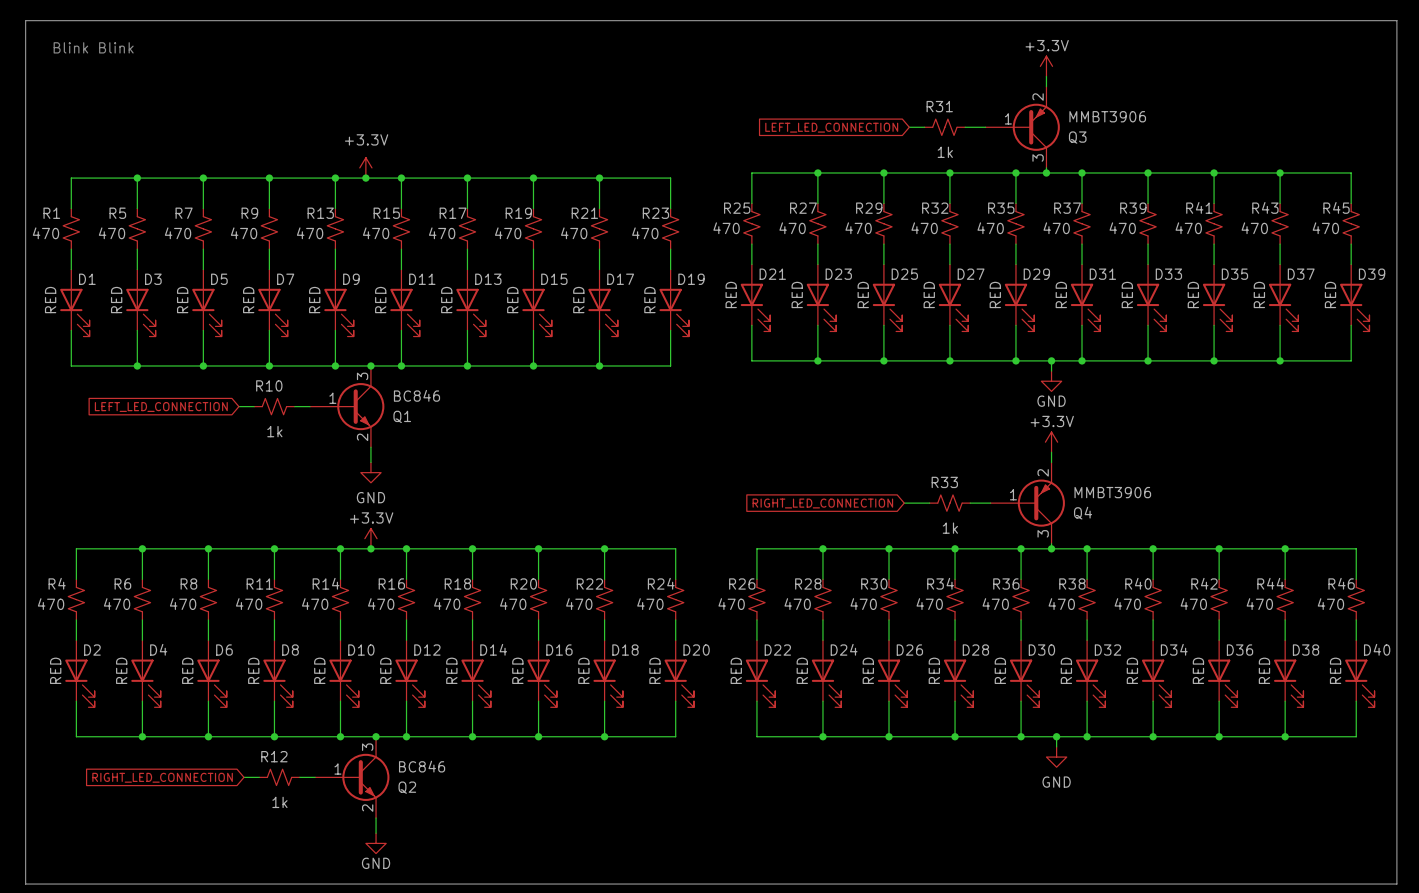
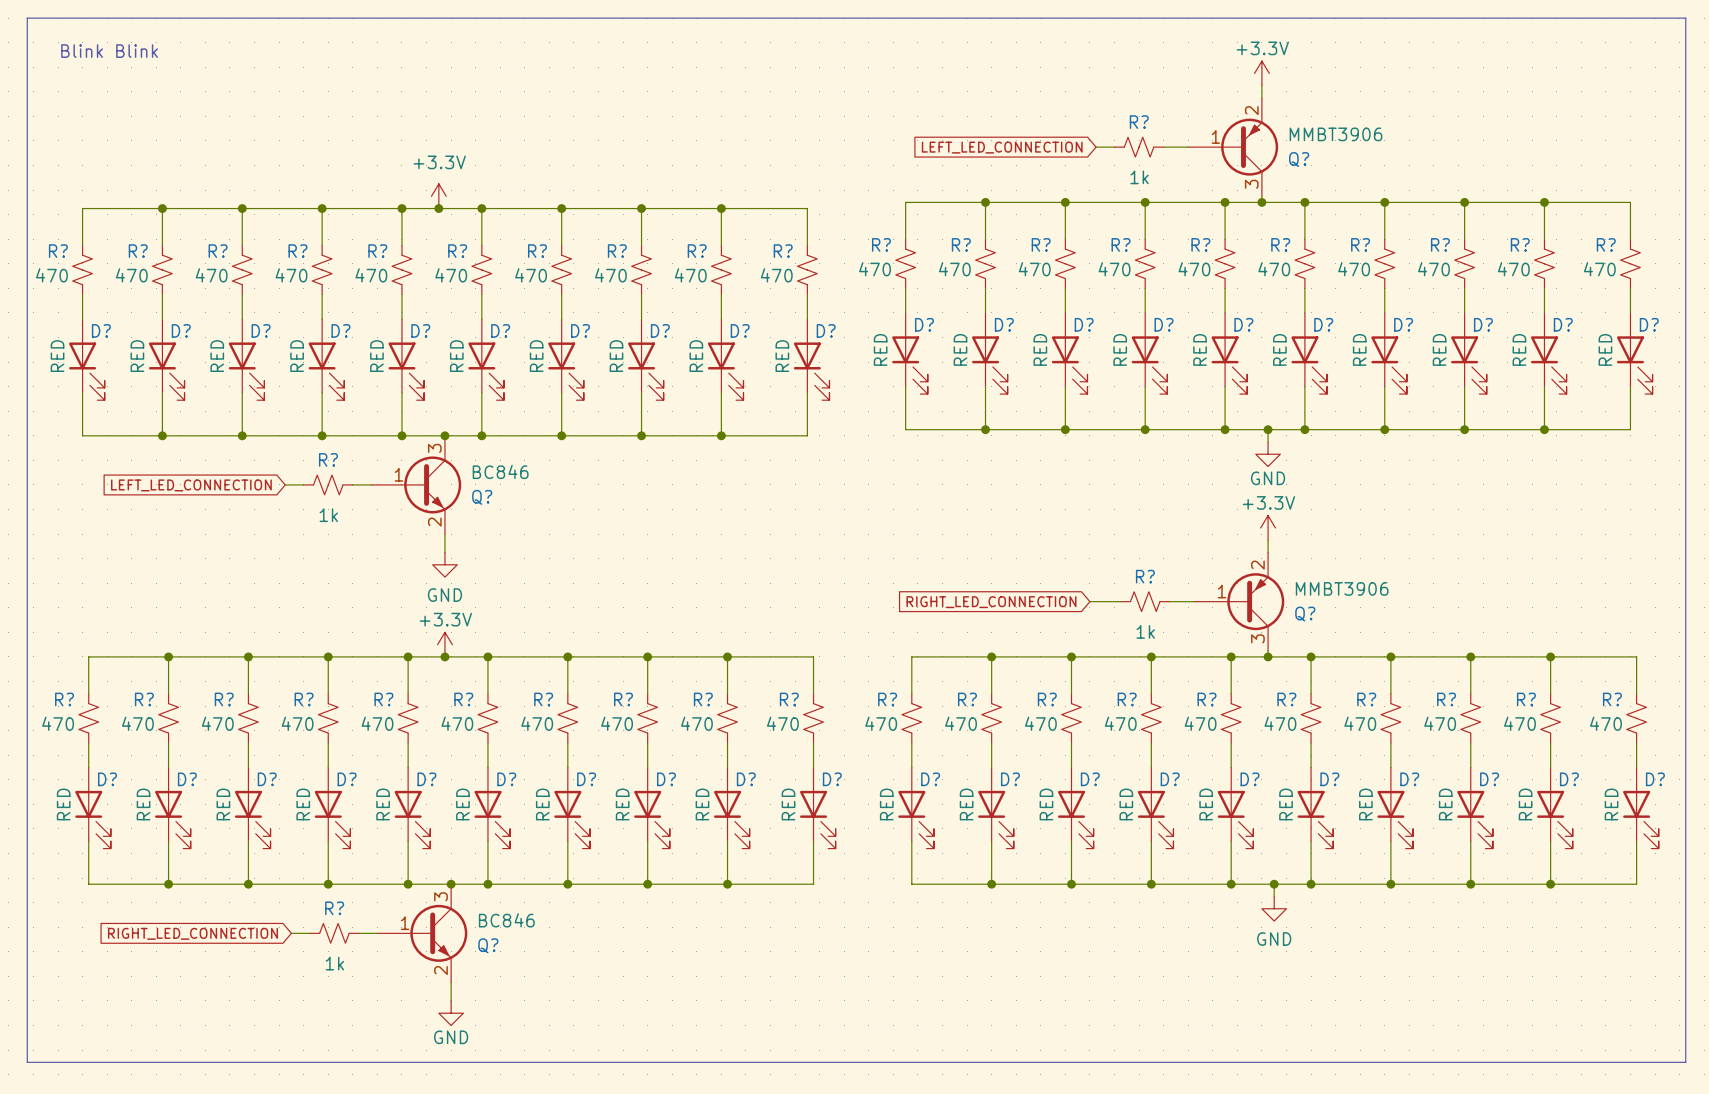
R31 name: R31 (939, 106) -> R? (1139, 122)
Q3 name: Q3 (1077, 137) -> Q? (1299, 159)
R41 name: R41 (1199, 207) -> R? (1440, 244)
R43 name: R43 (1265, 207) -> R? (1520, 244)
R45 name: R45 (1336, 207) -> R? (1606, 244)
R25 name: R25 (737, 208) -> R? (881, 244)
R27 name: R27 (803, 208) -> R? (961, 244)
R29 name: R29 (869, 208) -> R? (1041, 244)
R32 name: R32 (935, 208) -> R? (1121, 244)
R35 name: R35 (1001, 208) -> R? (1200, 244)
R37 name: R37 (1067, 208) -> R? (1280, 244)
R39 name: R39 (1133, 208) -> R? (1360, 244)
R1 name: R1 (51, 213) -> R? (58, 251)
R5 name: R5 (117, 213) -> R? (138, 251)
R7 name: R7 (184, 213) -> R? (218, 251)
R9 name: R9 (249, 213) -> R? (297, 251)
R13 name: R13 (320, 213) -> R? (377, 251)
R15 name: R15 (386, 213) -> R? (457, 251)
R17 name: R17 (453, 213) -> R? (537, 251)
R19 name: R19 (518, 213) -> R? (617, 251)
R21 name: R21 (584, 213) -> R? (697, 251)
R23 name: R23 (655, 213) -> R? (783, 251)
D21 name: D21 (772, 274) -> D? (924, 324)
D23 name: D23 (838, 274) -> D? (1004, 324)
D25 name: D25 (904, 274) -> D? (1084, 324)
D27 name: D27 (971, 274) -> D? (1164, 324)
D29 name: D29 (1036, 274) -> D? (1243, 324)
D31 name: D31 (1102, 274) -> D? (1323, 324)
D33 name: D33 (1168, 274) -> D? (1403, 324)
D35 name: D35 (1234, 274) -> D? (1483, 324)
D37 name: D37 (1301, 274) -> D? (1563, 324)
D39 name: D39 (1372, 274) -> D? (1649, 324)
D1 name: D1 (87, 279) -> D? (101, 330)
D3 name: D3 (153, 279) -> D? (181, 330)
D5 name: D5 (219, 279) -> D? (261, 330)
D7 name: D7 (285, 279) -> D? (340, 330)
D9 name: D9 (351, 279) -> D? (420, 330)
D11 name: D11 (422, 279) -> D? (500, 330)
D13 name: D13 (488, 279) -> D? (580, 330)
D15 name: D15 (554, 279) -> D? (660, 330)
D17 name: D17 (620, 279) -> D? (740, 330)
D19 name: D19 (691, 279) -> D? (826, 330)
R10 name: R10 (269, 385) -> R? (328, 459)
Q1 name: Q1 (402, 416) -> Q? (482, 497)
R33 name: R33 (944, 482) -> R? (1145, 576)
Q4 name: Q4 (1083, 513) -> Q? (1305, 614)
R4 name: R4 (57, 583) -> R? (64, 699)
R14 name: R14 (326, 583) -> R? (383, 699)
R24 name: R24 (661, 583) -> R? (789, 699)
R34 name: R34 (940, 583) -> R? (1127, 699)
R40 name: R40 (1138, 583) -> R? (1366, 699)
R42 name: R42 (1204, 583) -> R? (1446, 699)
R44 name: R44 (1270, 583) -> R? (1526, 699)
R46 name: R46 (1341, 583) -> R? (1612, 699)
R6 name: R6 (122, 584) -> R? (144, 699)
R8 name: R8 (188, 584) -> R? (224, 699)
R11 name: R11 (259, 584) -> R? (304, 699)
R16 name: R16 (391, 584) -> R? (463, 699)
R18 name: R18 (457, 584) -> R? (543, 699)
R20 name: R20 (523, 584) -> R? (623, 699)
R22 name: R22 (589, 584) -> R? (703, 699)
R26 name: R26 (742, 584) -> R? (887, 699)
R28 name: R28 (808, 584) -> R? (967, 699)
R30 name: R30 (874, 584) -> R? (1047, 699)
R36 name: R36 (1006, 584) -> R? (1207, 699)
R38 name: R38 (1072, 584) -> R? (1286, 699)
D4 name: D4 (158, 649) -> D? (187, 779)
D14 name: D14 (493, 649) -> D? (586, 779)
D24 name: D24 (844, 649) -> D? (1010, 779)
D34 name: D34 (1174, 649) -> D? (1409, 779)
D40 name: D40 (1377, 649) -> D? (1655, 779)
D2 name: D2 (92, 650) -> D? (107, 779)
D6 name: D6 (224, 650) -> D? (267, 779)
D8 name: D8 (290, 650) -> D? (347, 779)
D10 name: D10 (361, 650) -> D? (426, 779)
D12 name: D12 (427, 650) -> D? (506, 779)
D16 name: D16 (559, 650) -> D? (666, 779)
D18 name: D18 (625, 650) -> D? (746, 779)
D20 name: D20 (696, 650) -> D? (832, 779)
D22 name: D22 (777, 650) -> D? (930, 779)
D26 name: D26 (909, 650) -> D? (1090, 779)
D28 name: D28 (975, 650) -> D? (1170, 779)
D30 name: D30 (1041, 650) -> D? (1250, 779)
D32 name: D32 (1107, 650) -> D? (1329, 779)
D36 name: D36 (1240, 650) -> D? (1489, 779)
D38 name: D38 (1306, 650) -> D? (1569, 779)
R12 name: R12 (274, 756) -> R? (334, 908)
Q2 name: Q2 (407, 787) -> Q? (488, 945)

